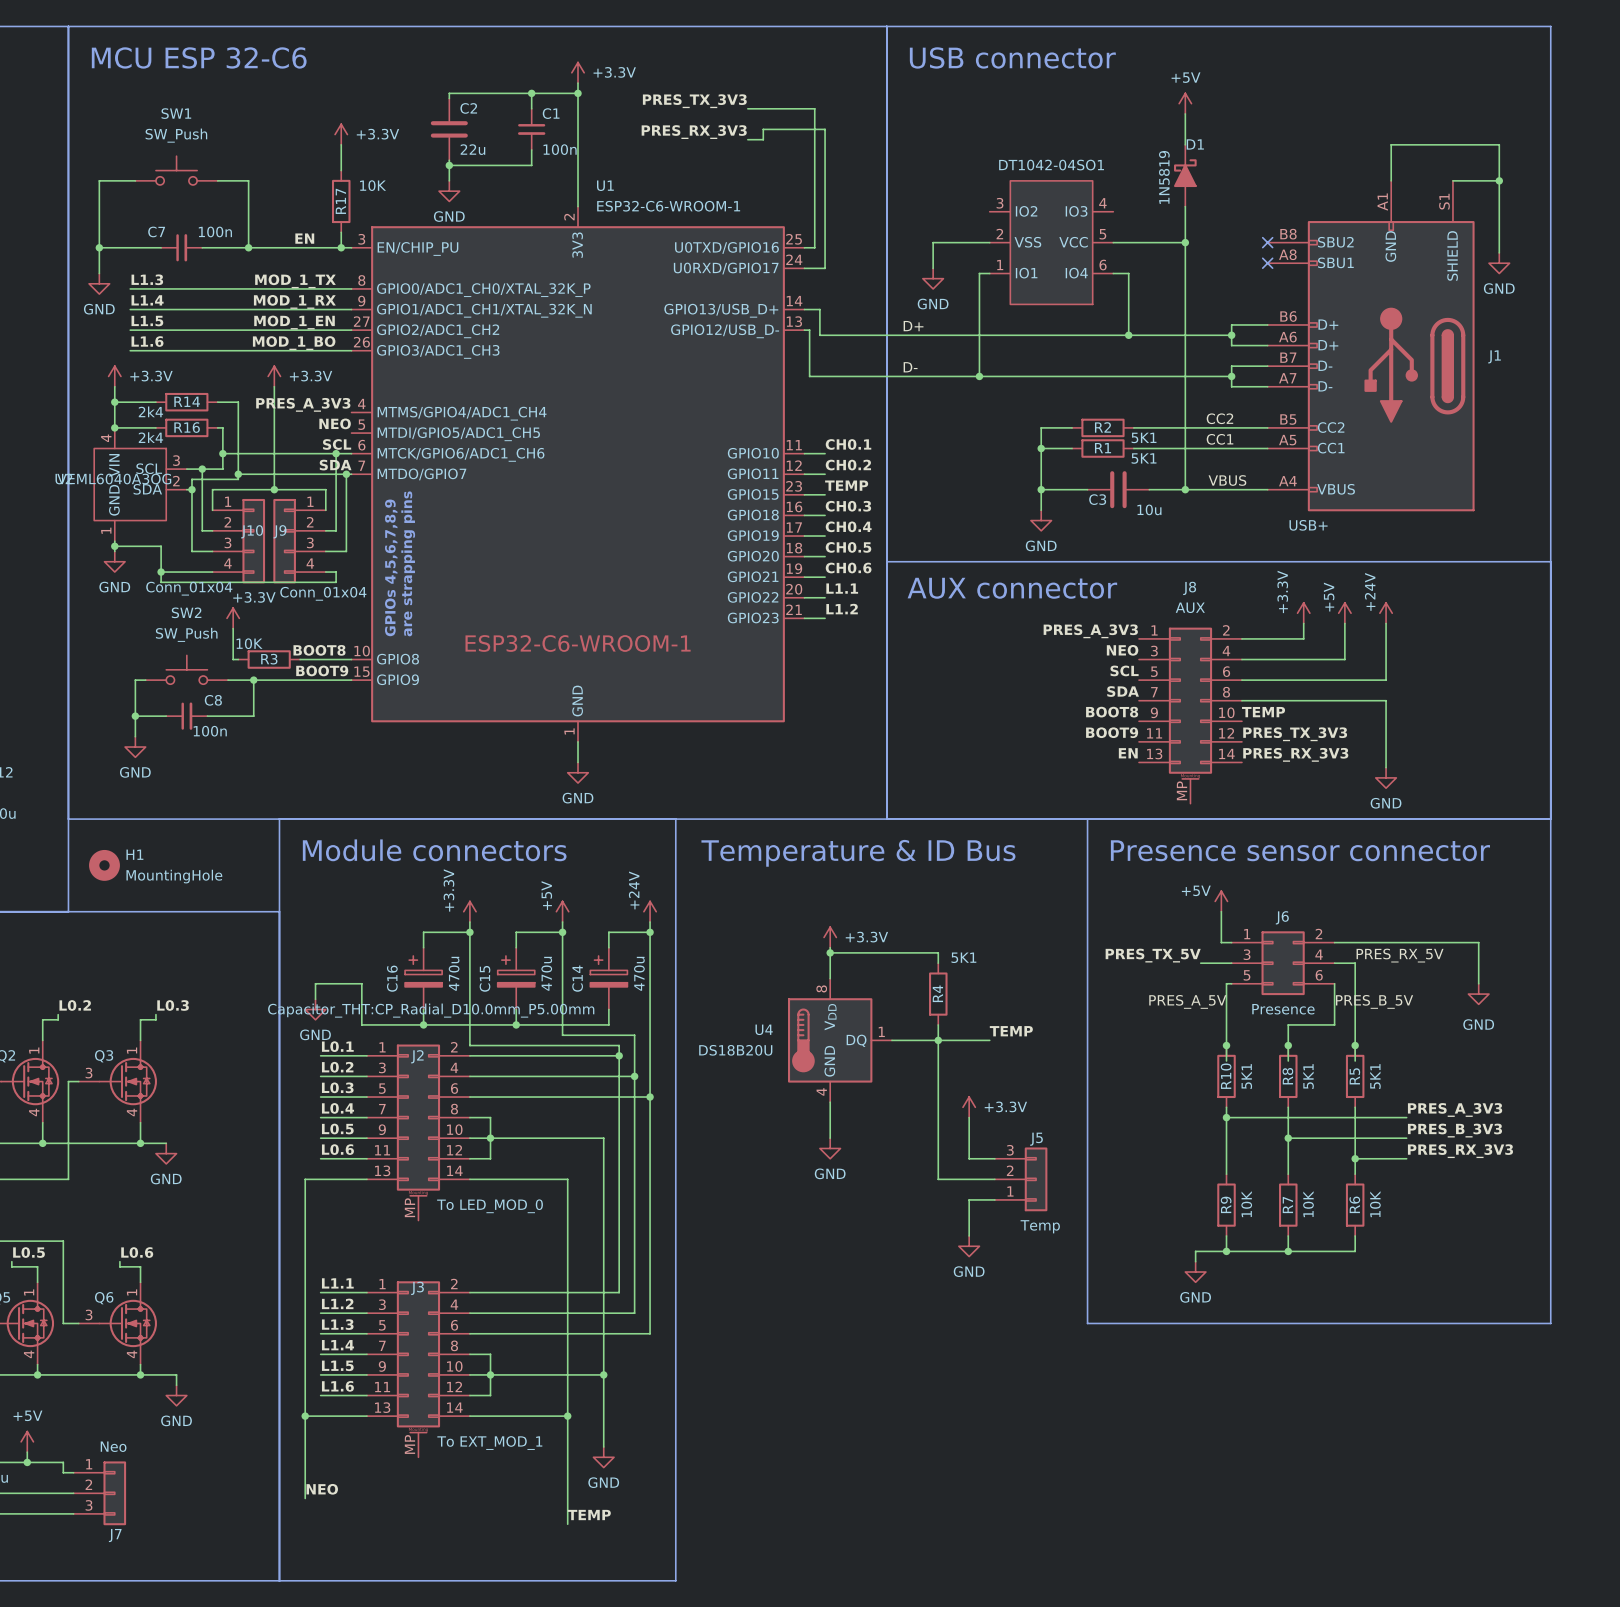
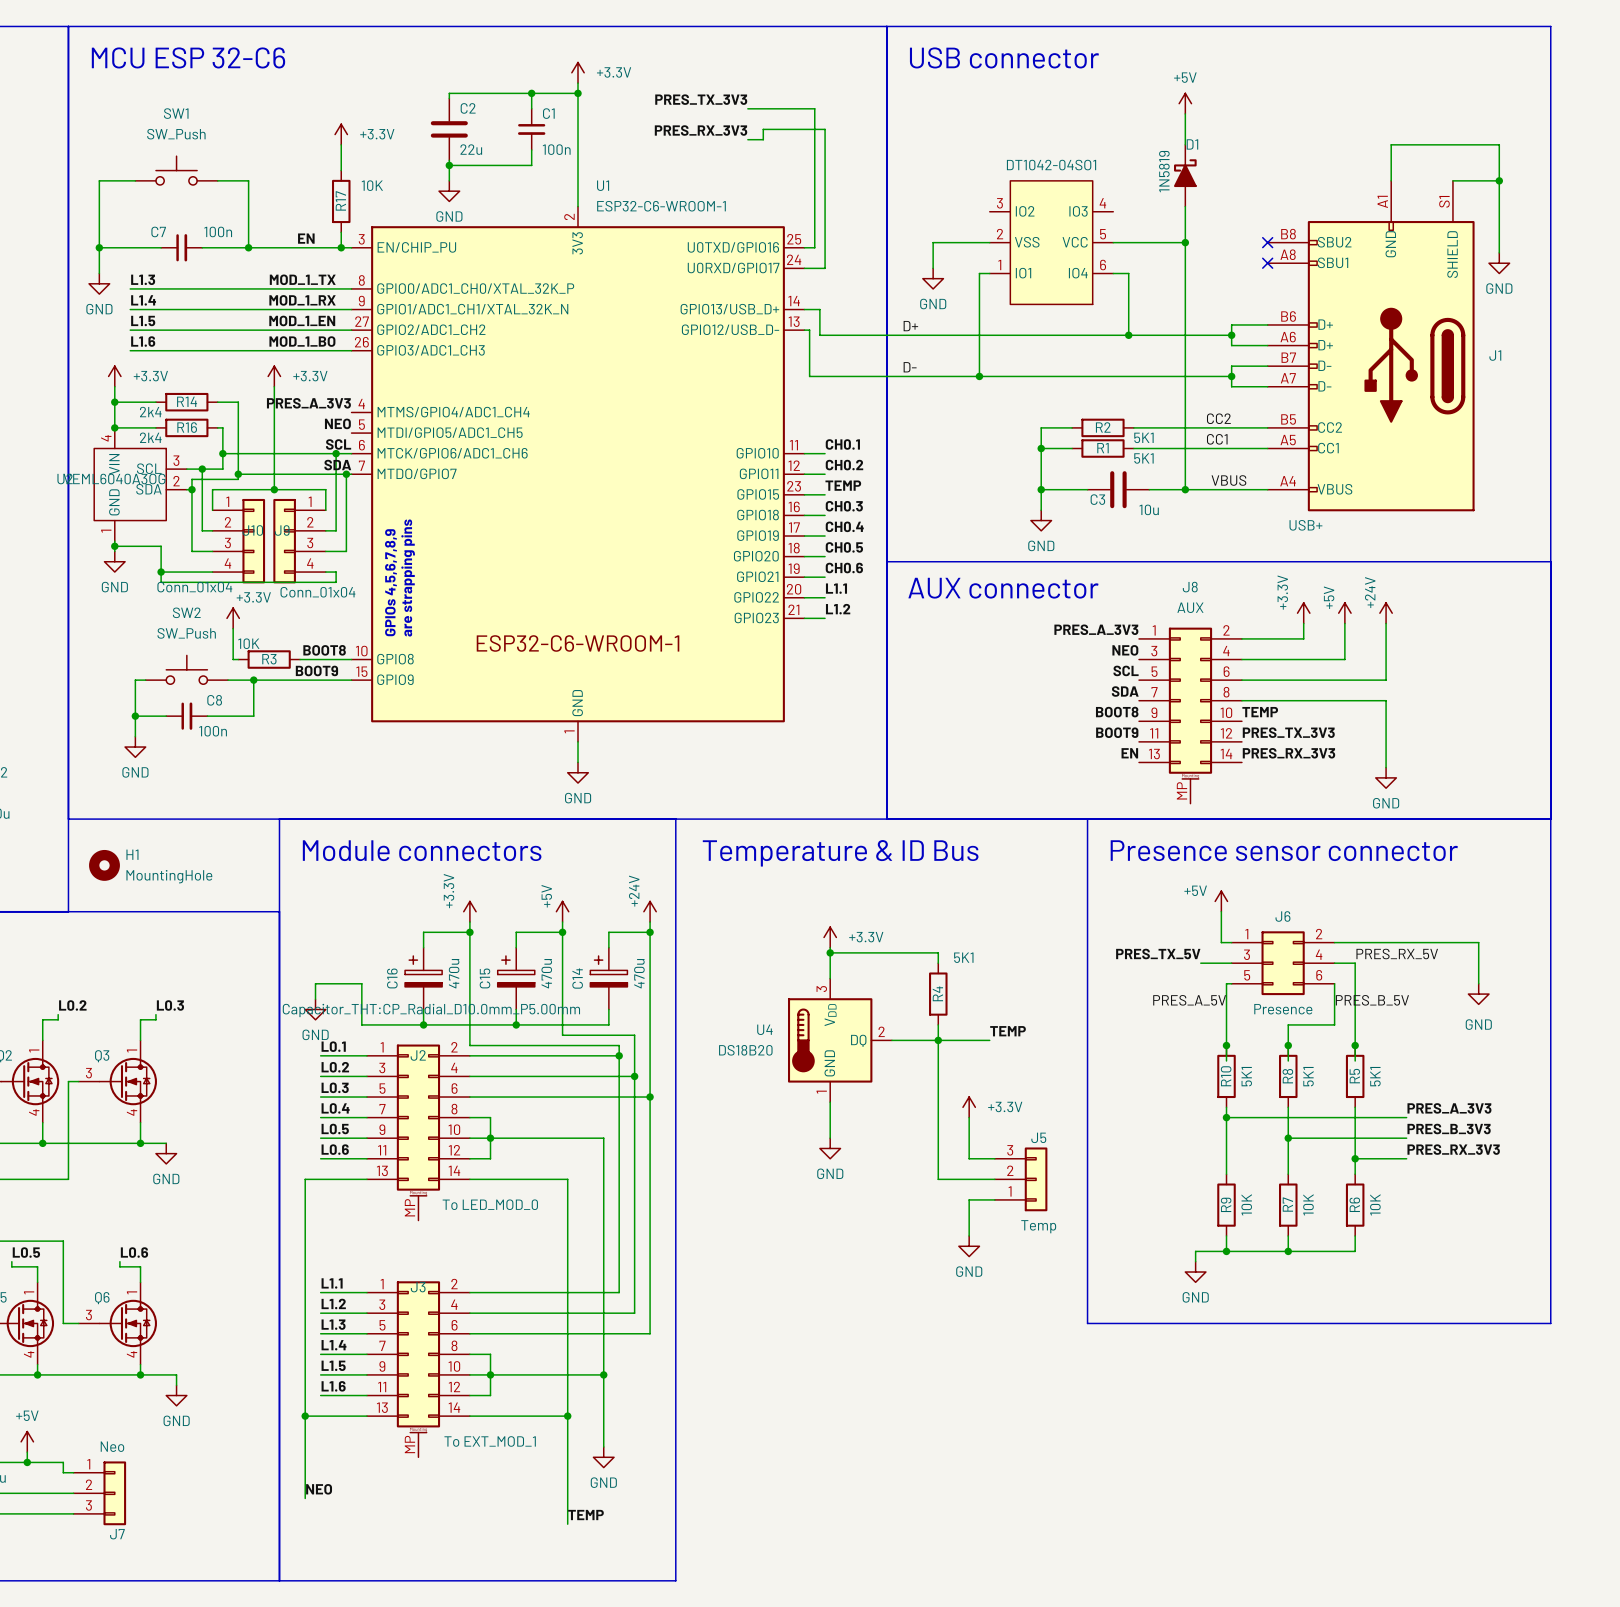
U4 pin number: 8 (821, 988) -> 3 (821, 989)
U4 pin number: 1 (881, 1031) -> 2 (881, 1031)
U4 value: DS18B20U (735, 1050) -> DS18B20 (745, 1050)
U4 pin number: 4 (821, 1091) -> 1 (821, 1092)

